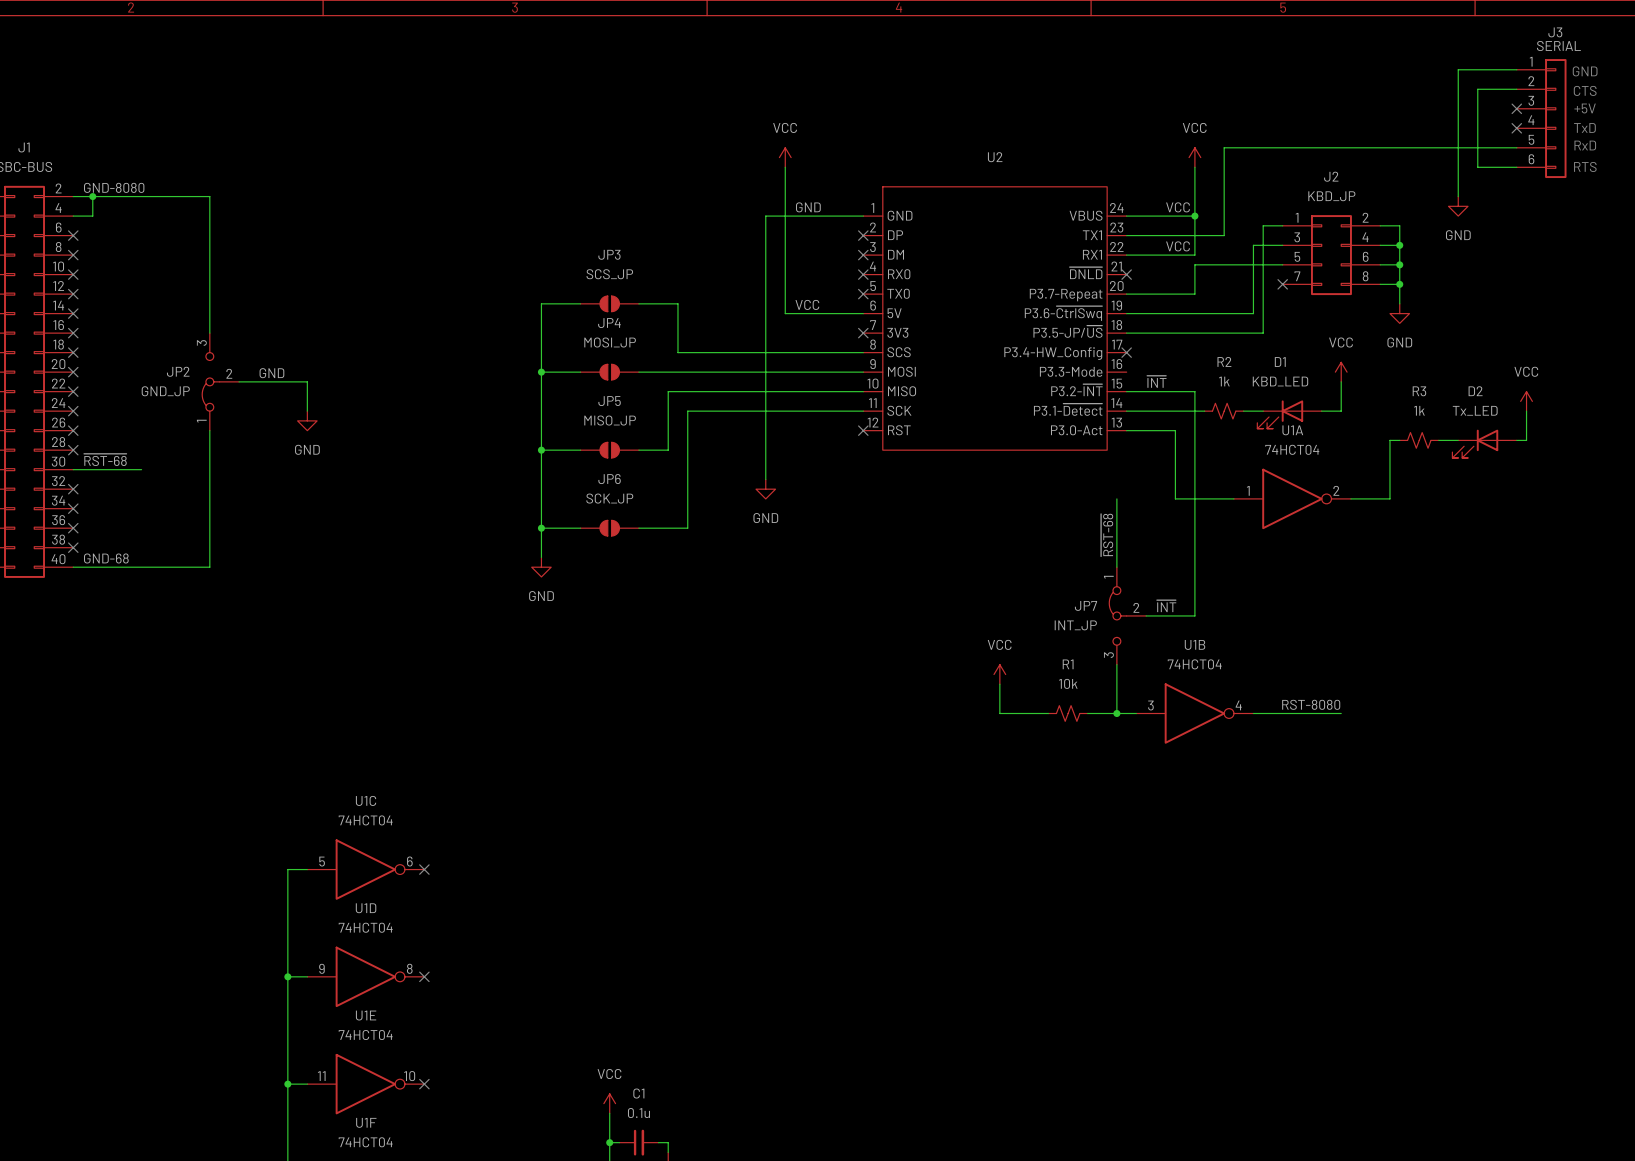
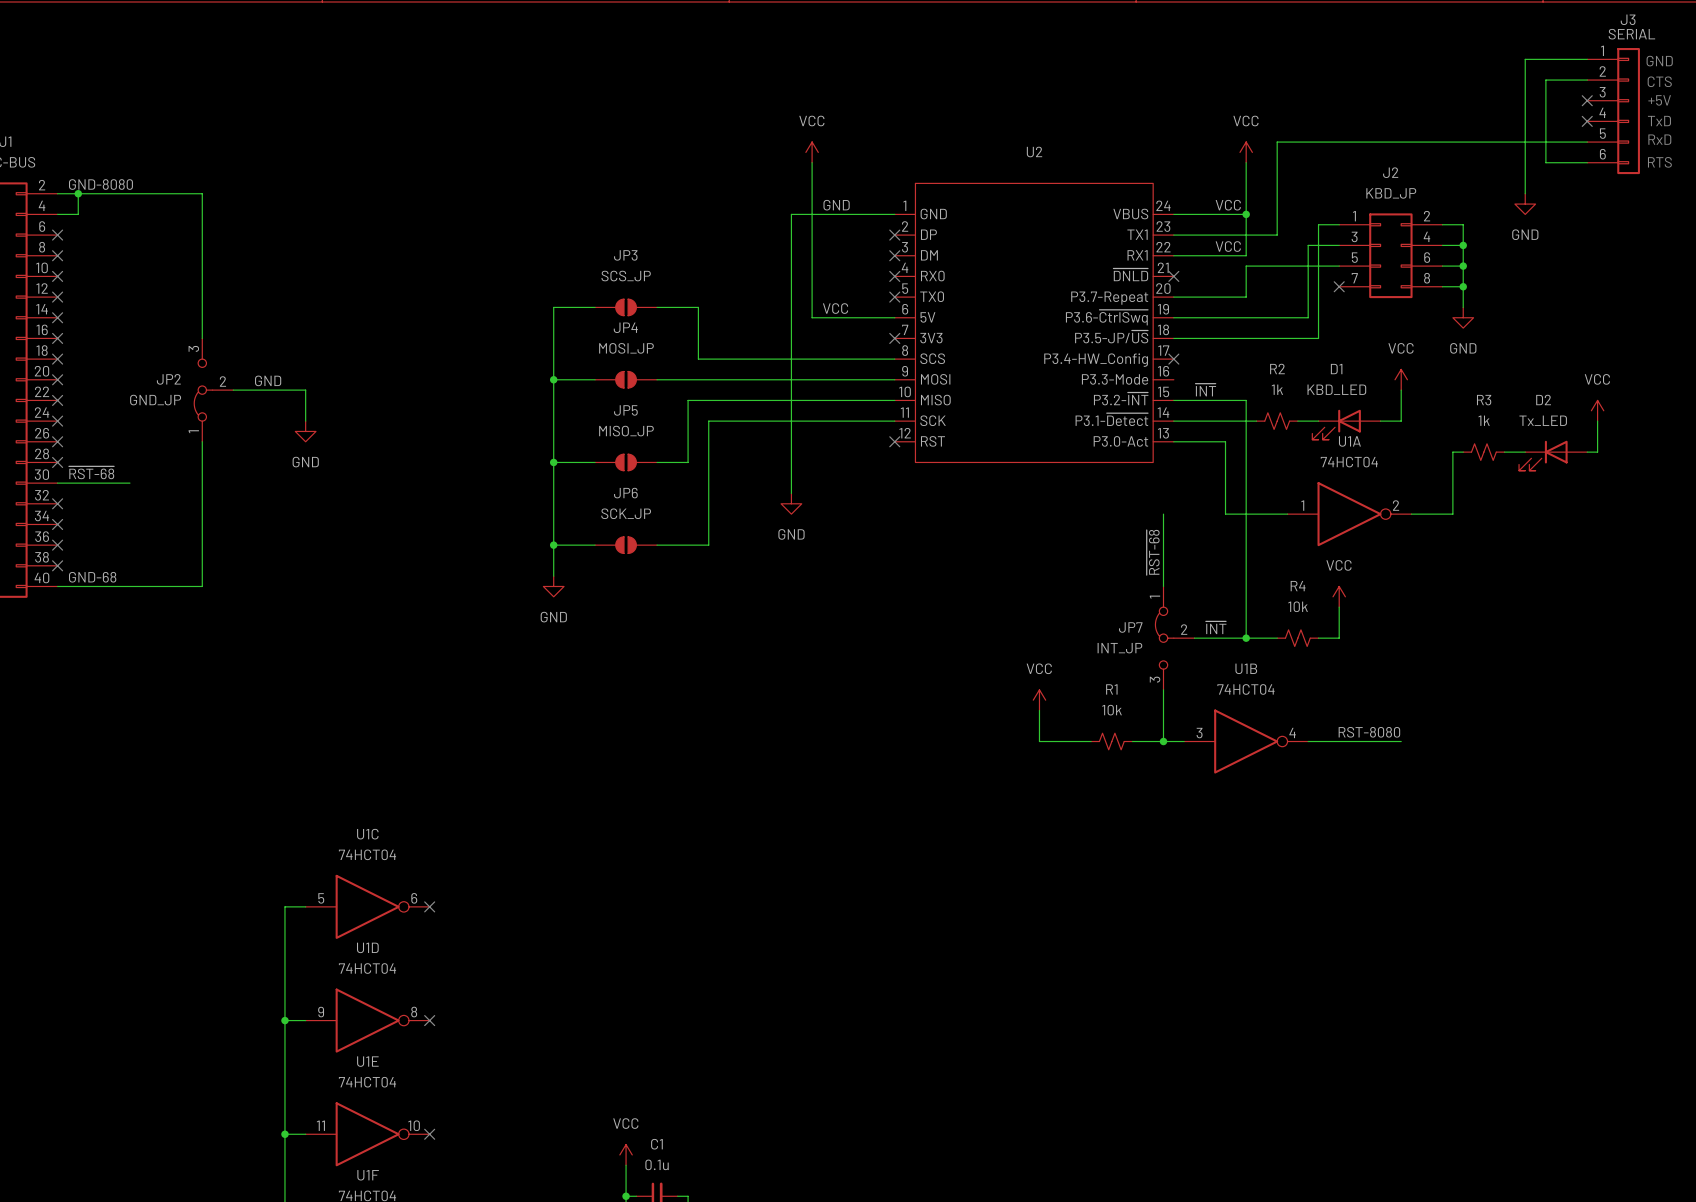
power symbol: none -> VCC (1339, 596)
wire: none -> (1339, 607) (1339, 638) (1318, 638)
wire: none -> (1246, 638) (1277, 638)
junction: none -> (1246, 638)
R4: none -> 10k (1297, 638)

